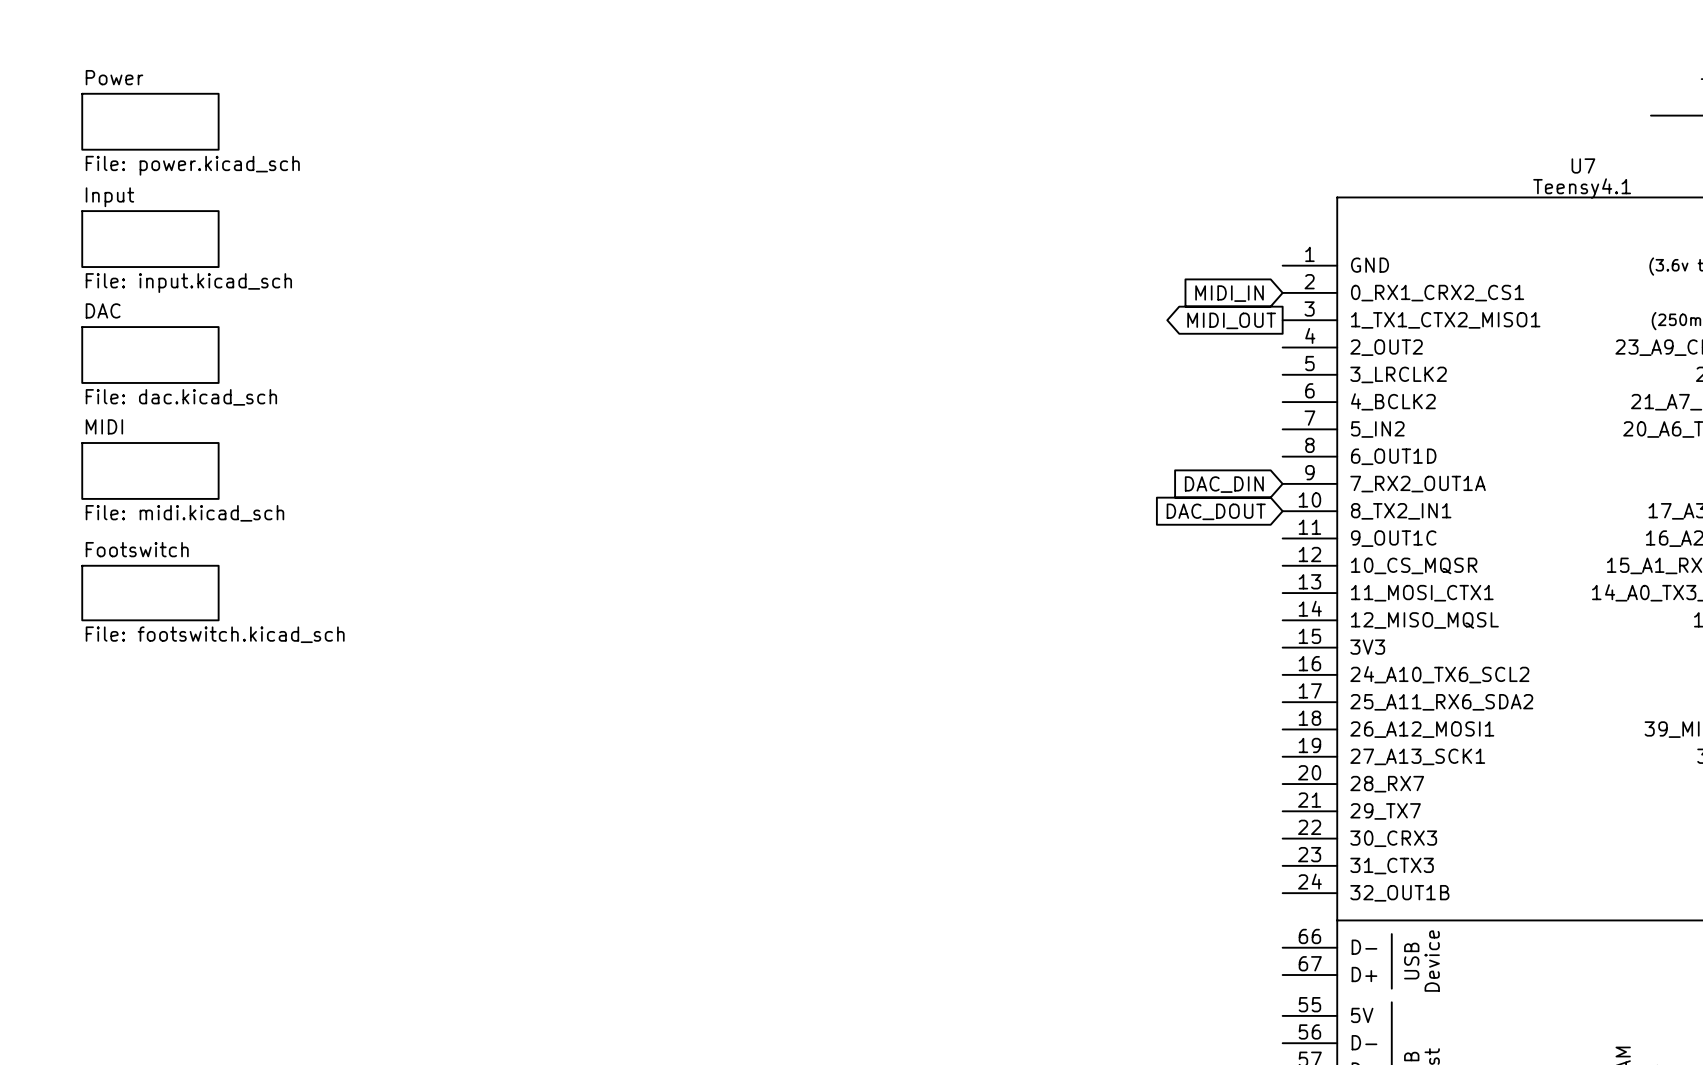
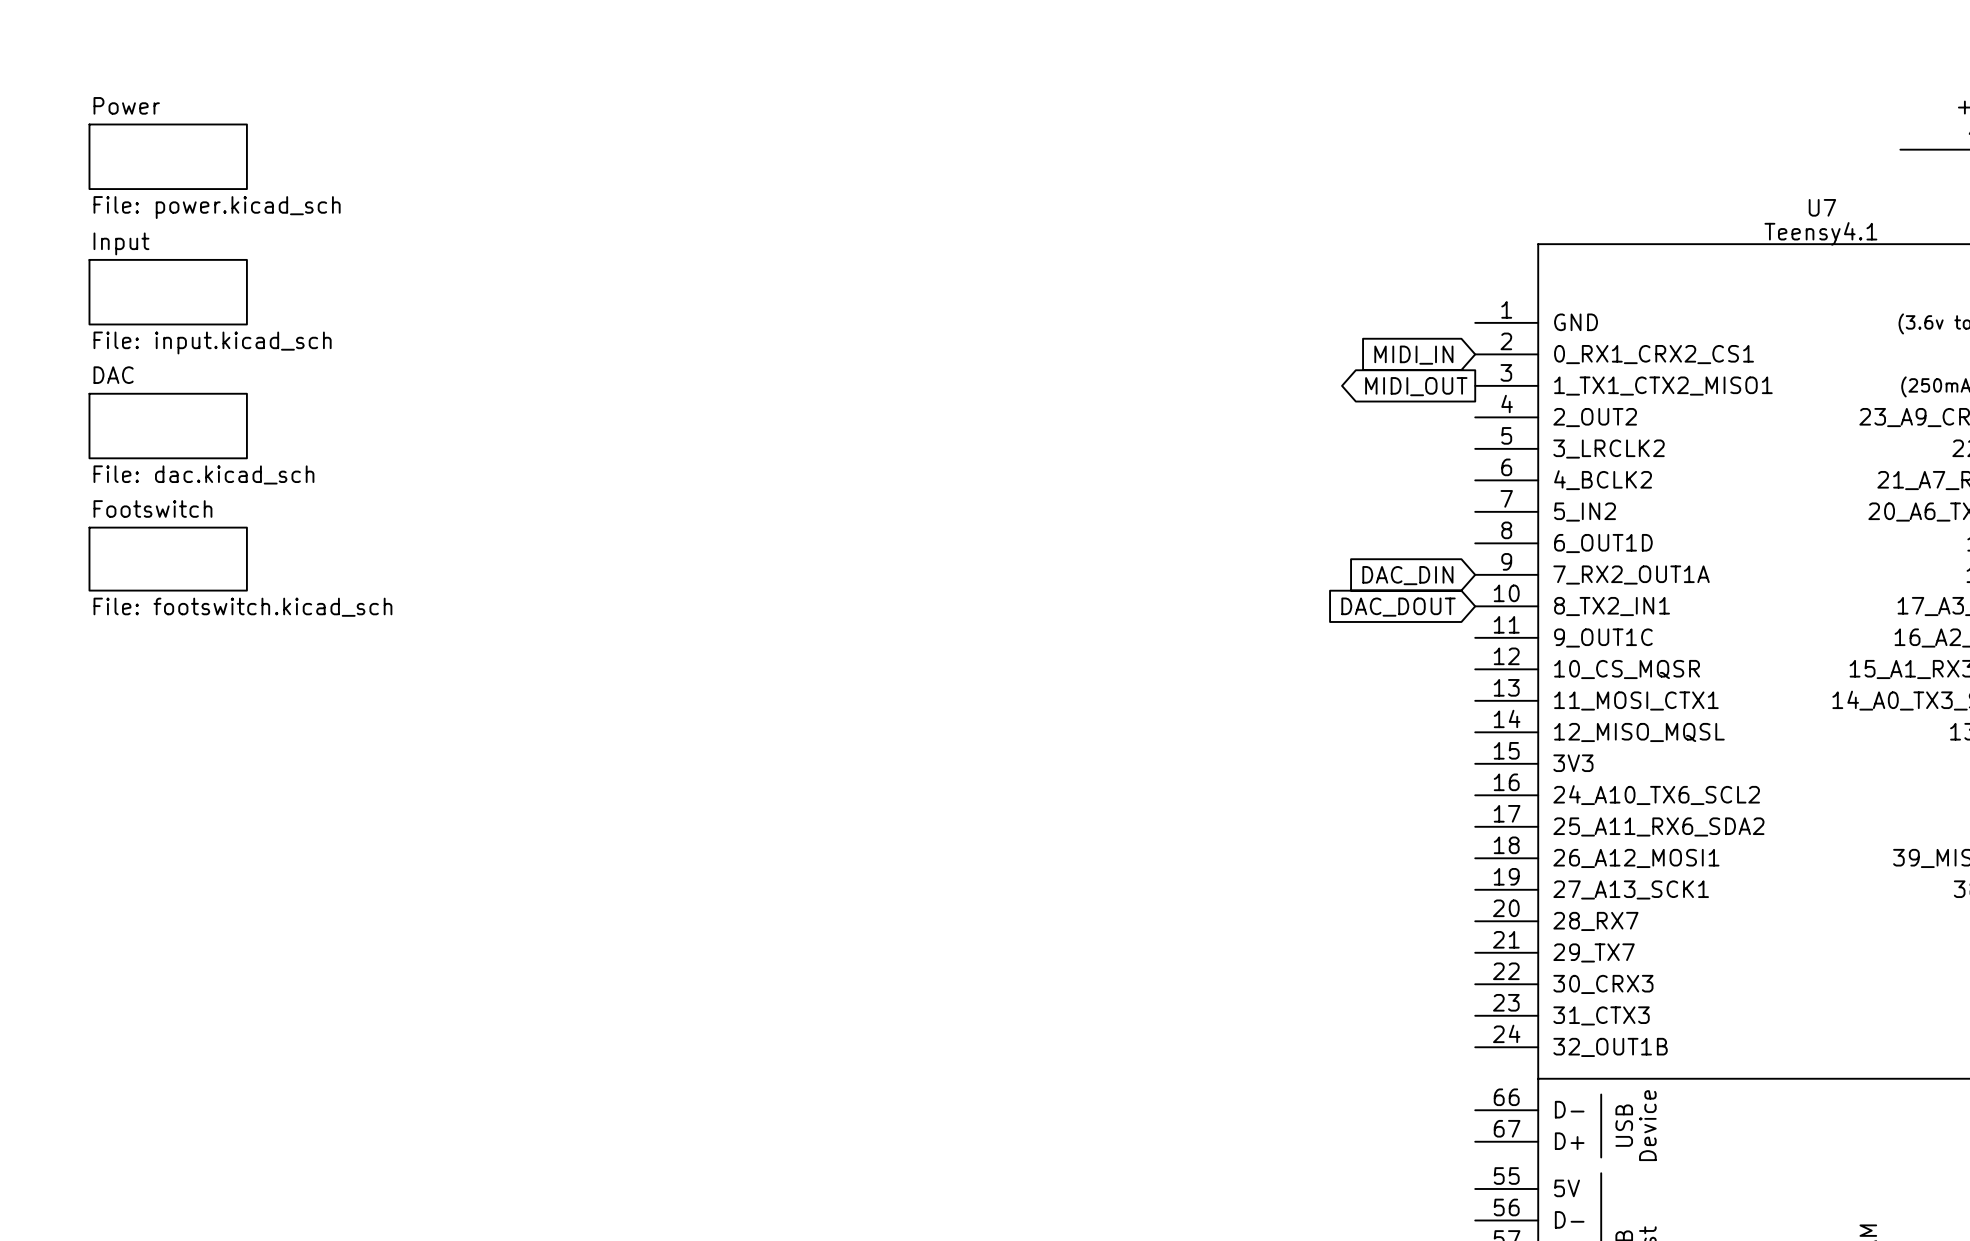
sheet MIDI: File: midi.kicad_sch (150, 470) -> none
sheet Footswitch position: (150, 593) -> (168, 559)

